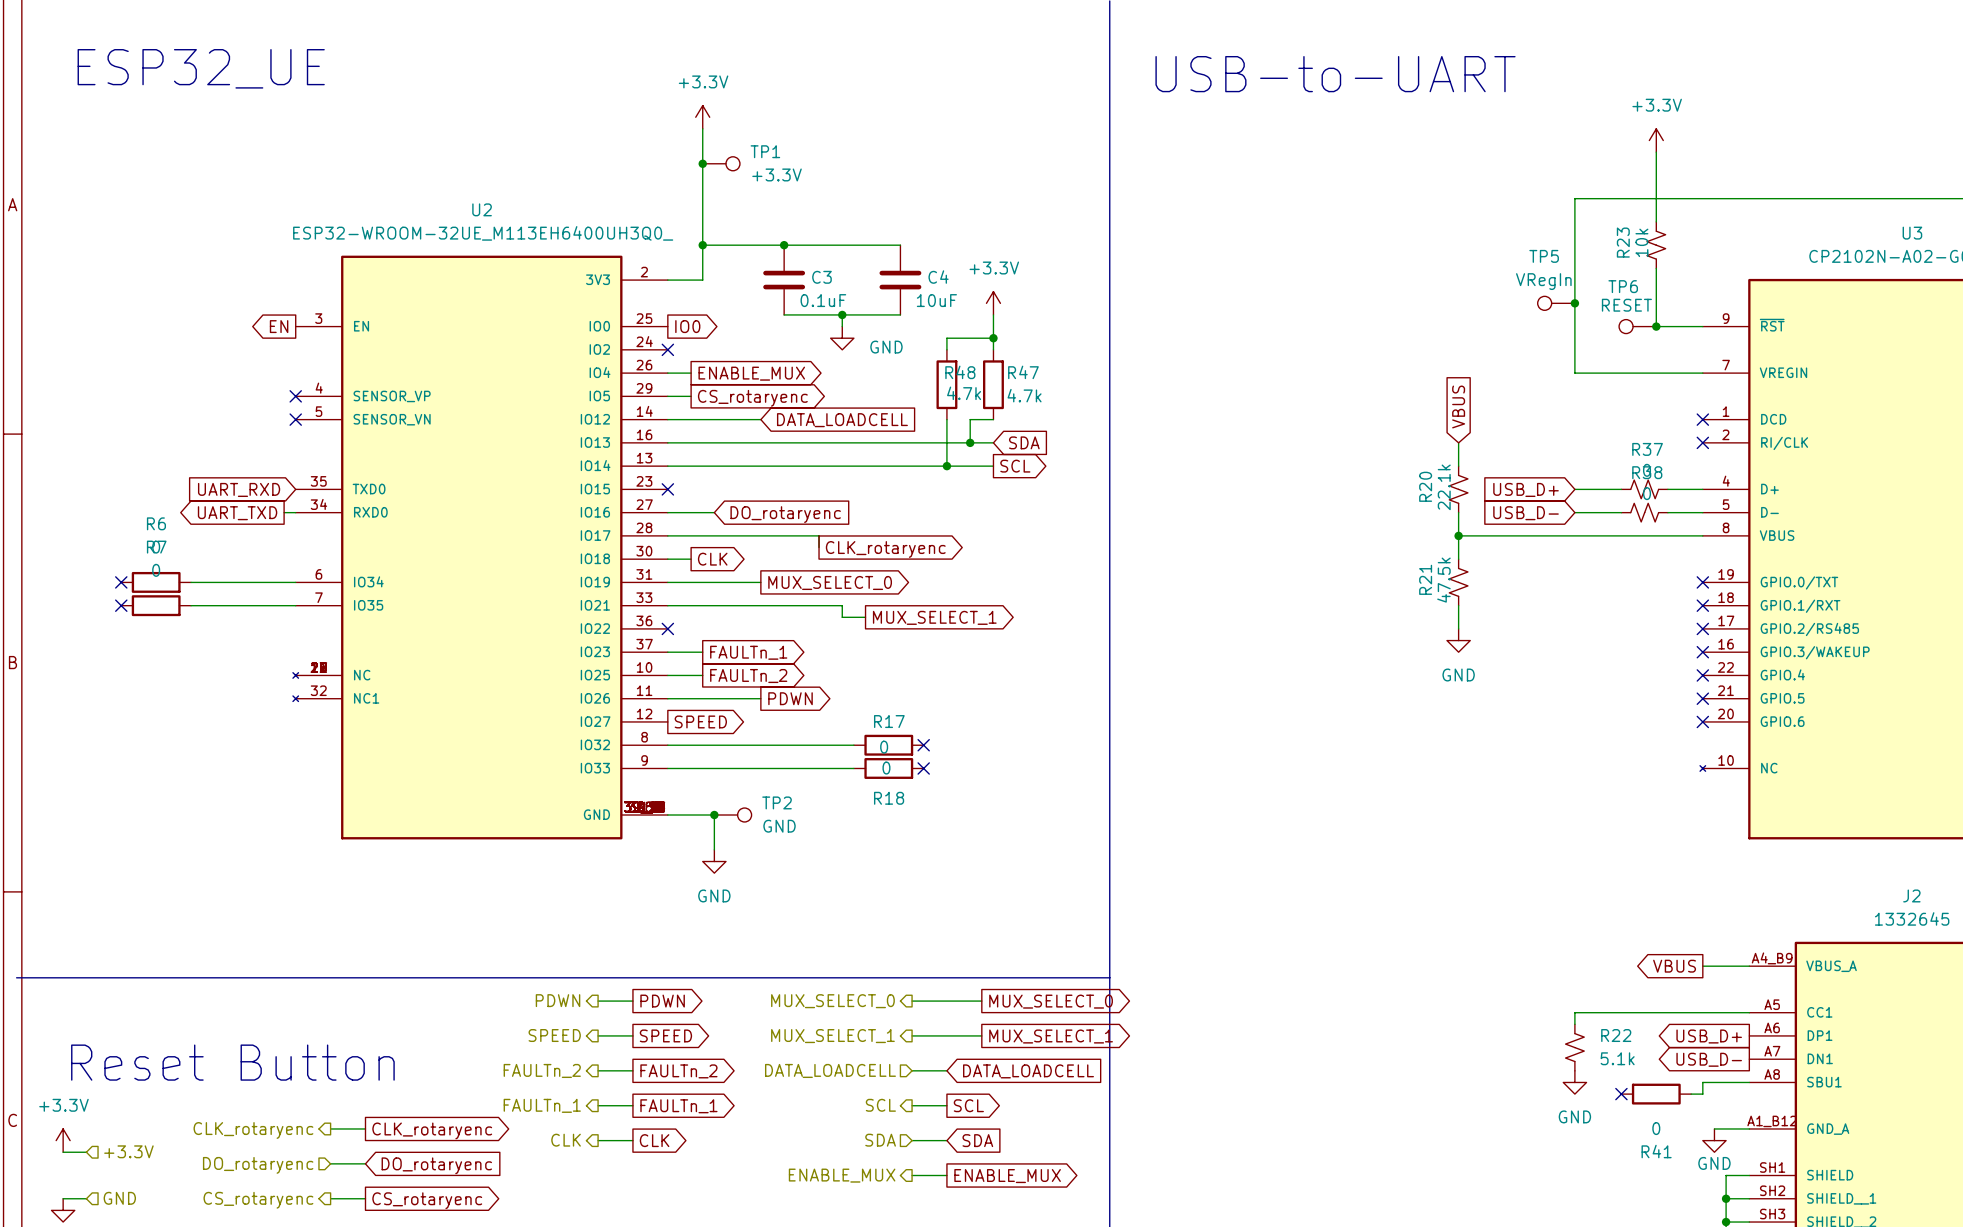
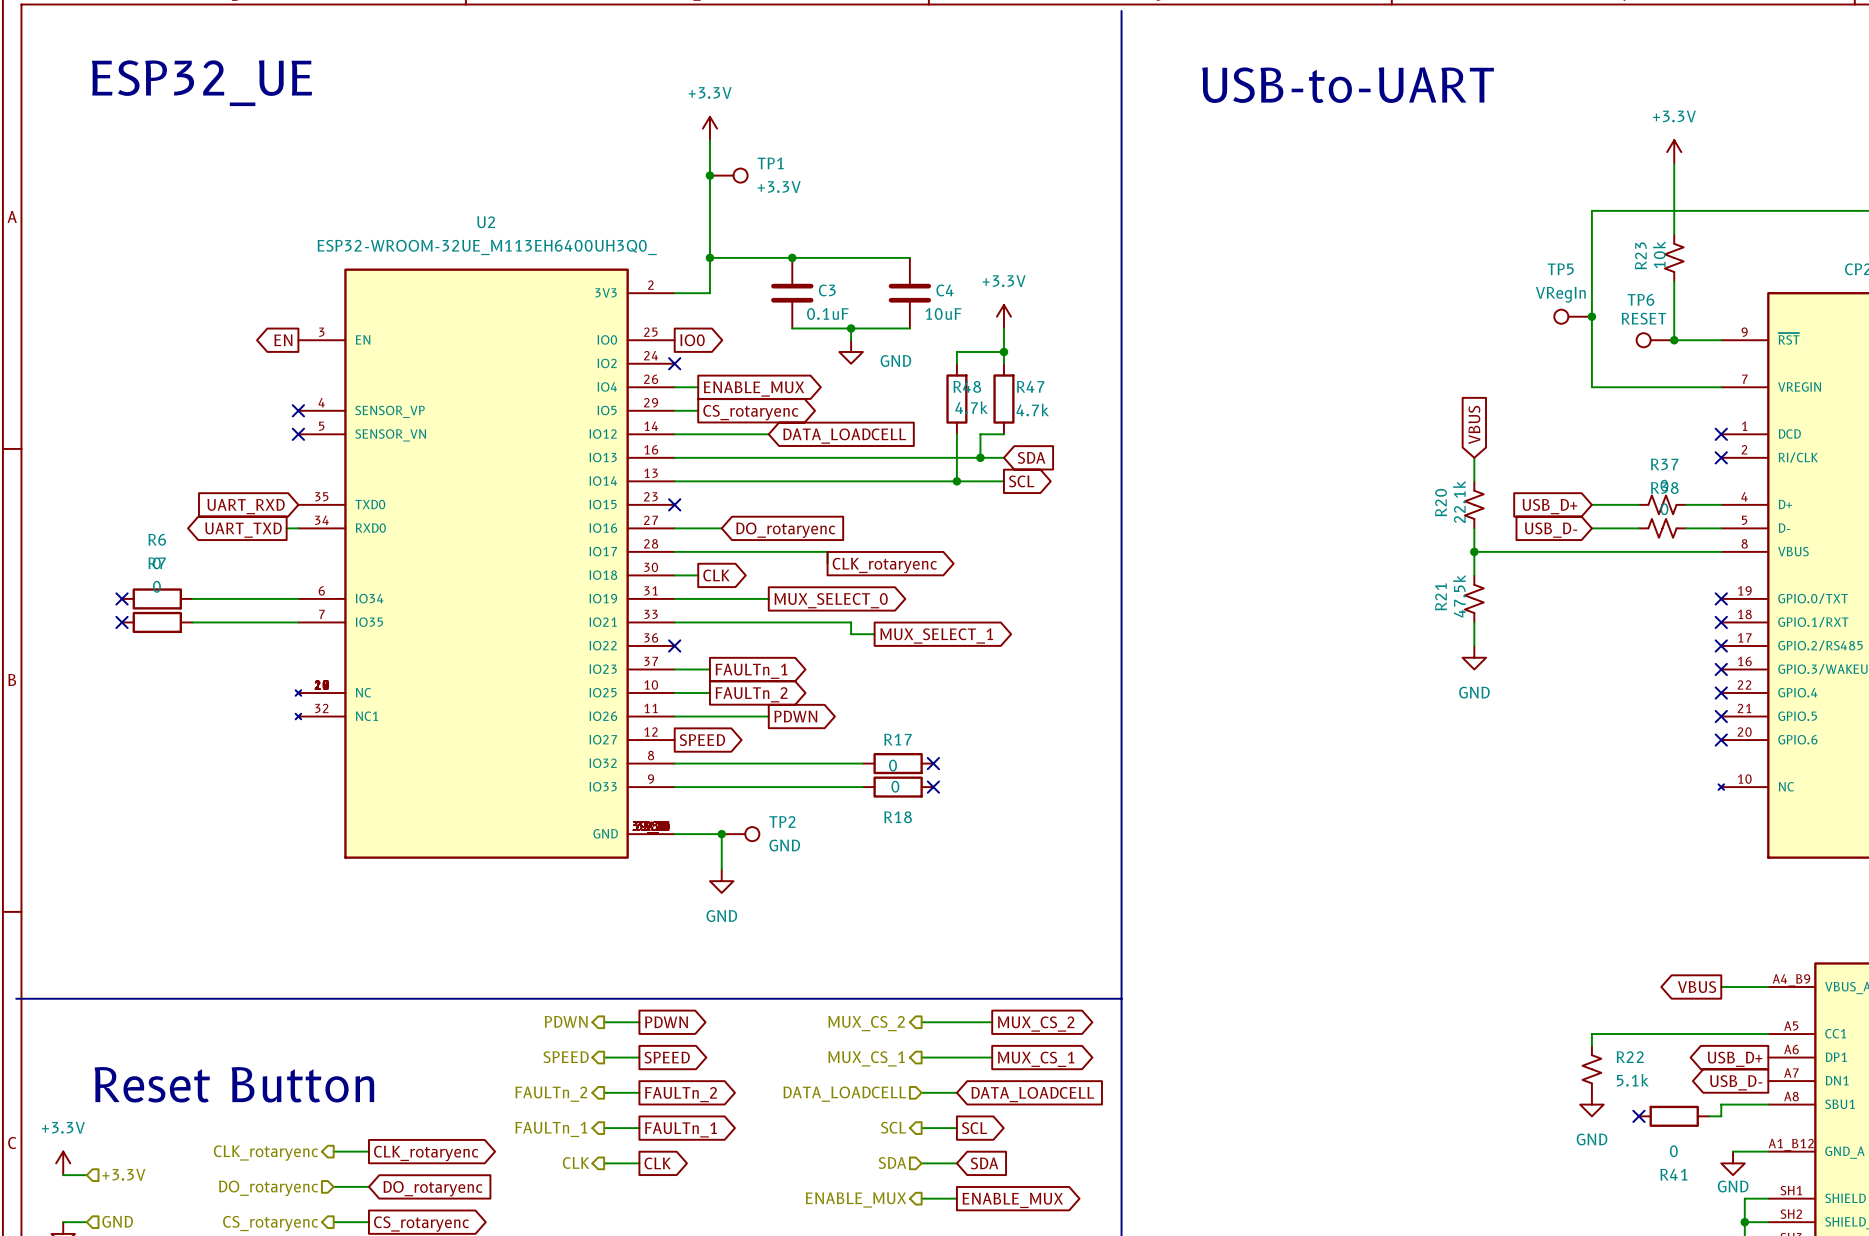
hierarchical label: MUX_SELECT_0 (832, 1001) -> MUX_CS_2 (866, 1023)
global label: MUX_SELECT_0 (1051, 1001) -> MUX_CS_2 (1036, 1024)
hierarchical label: MUX_SELECT_1 (832, 1036) -> MUX_CS_1 (866, 1058)
global label: MUX_SELECT_1 (1051, 1036) -> MUX_CS_1 (1036, 1059)

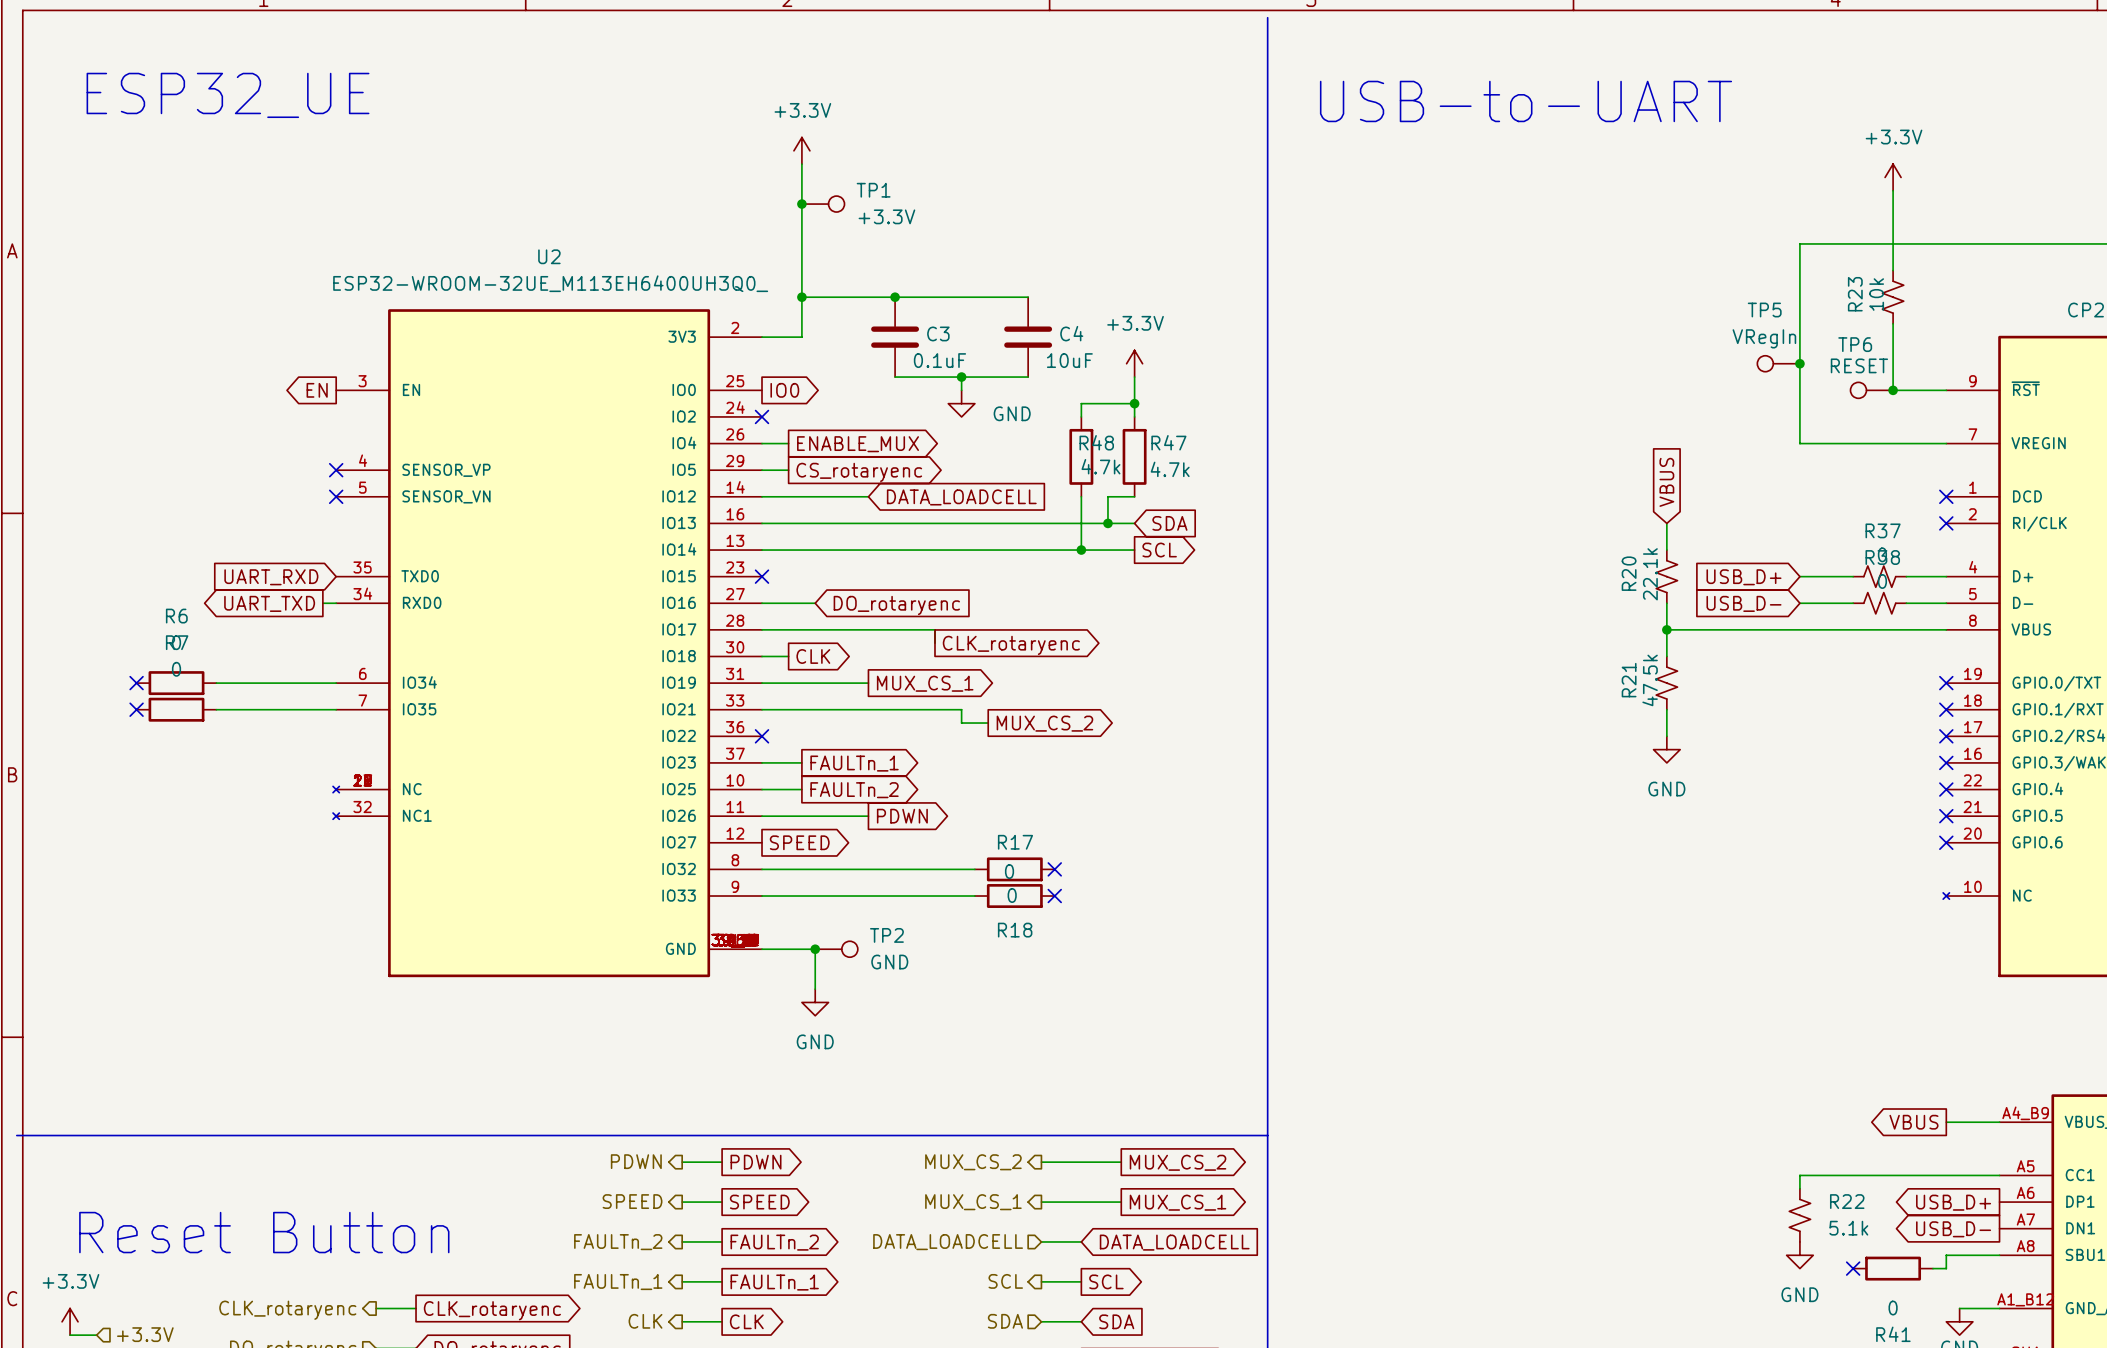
global label: MUX_SELECT_0 (831, 600) -> MUX_CS_1 (925, 683)
global label: MUX_SELECT_1 (936, 635) -> MUX_CS_2 (1044, 723)

